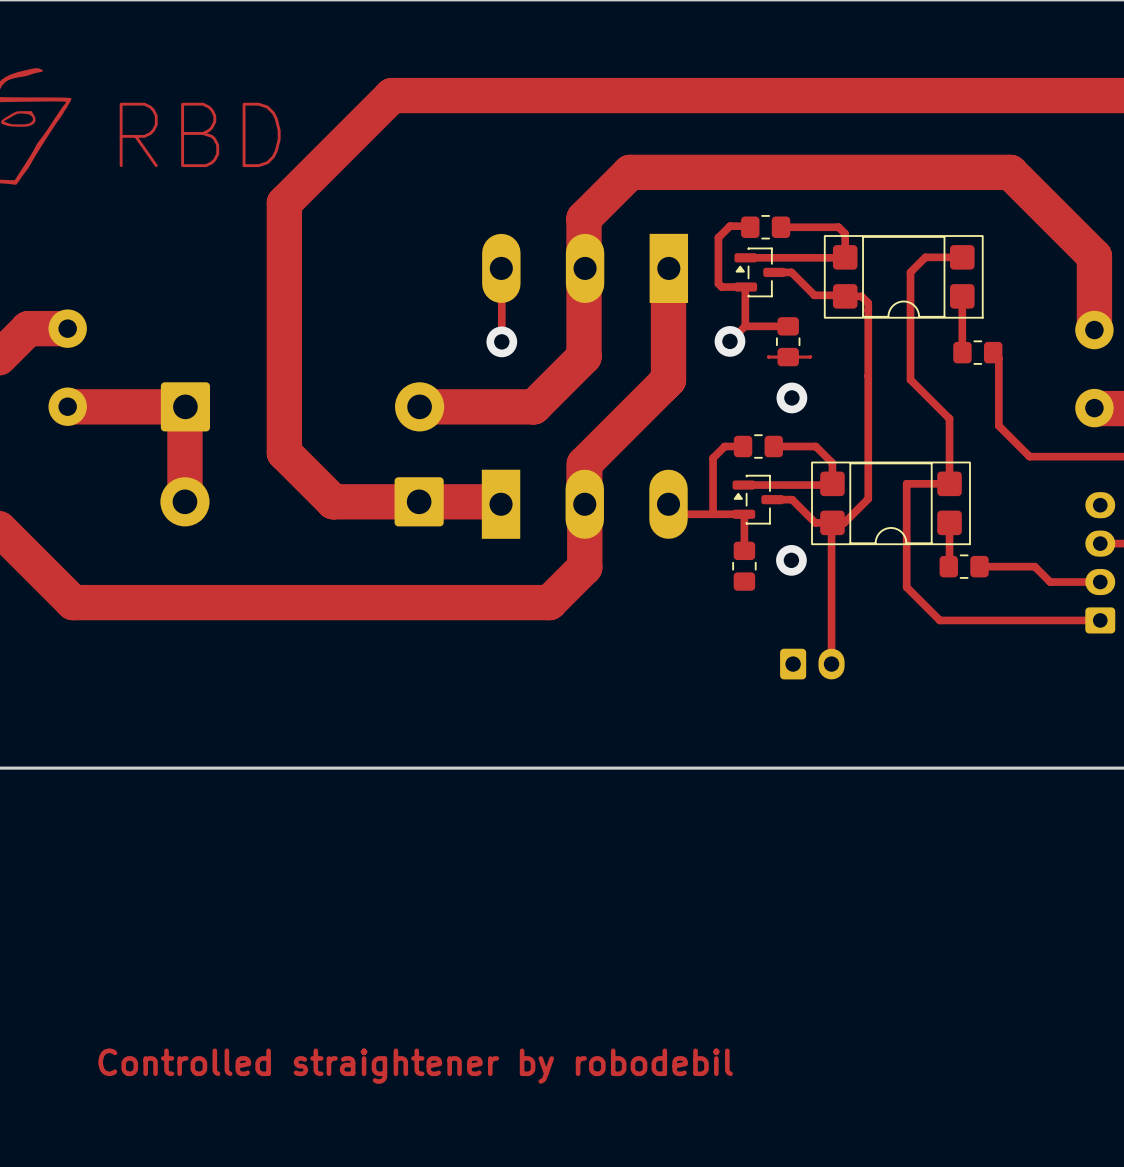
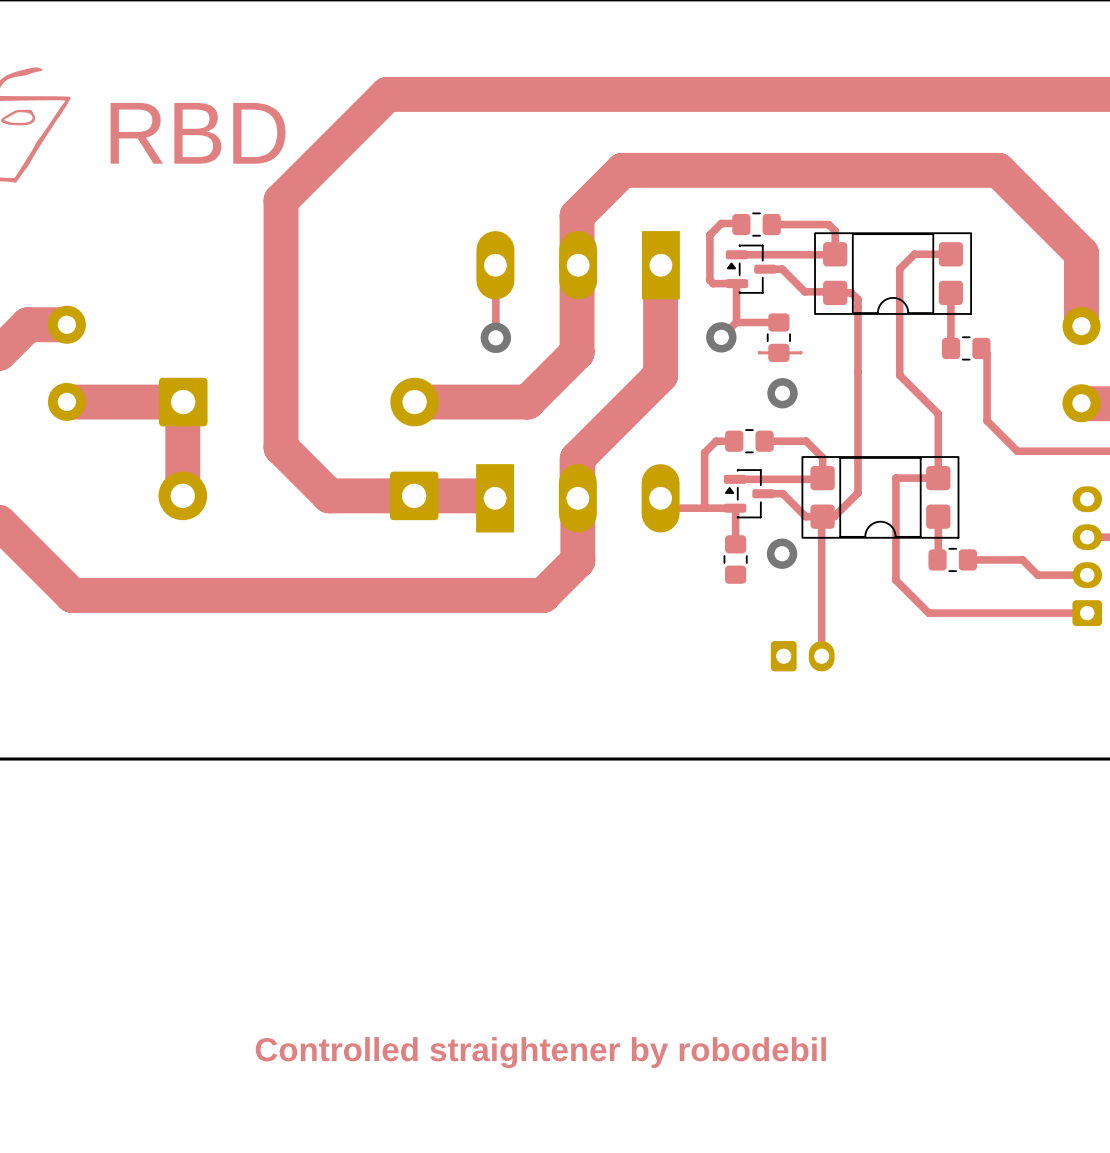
text position: Controlled straightener by robodebil (415, 1066) -> Controlled straightener by robodebil (540, 1052)

